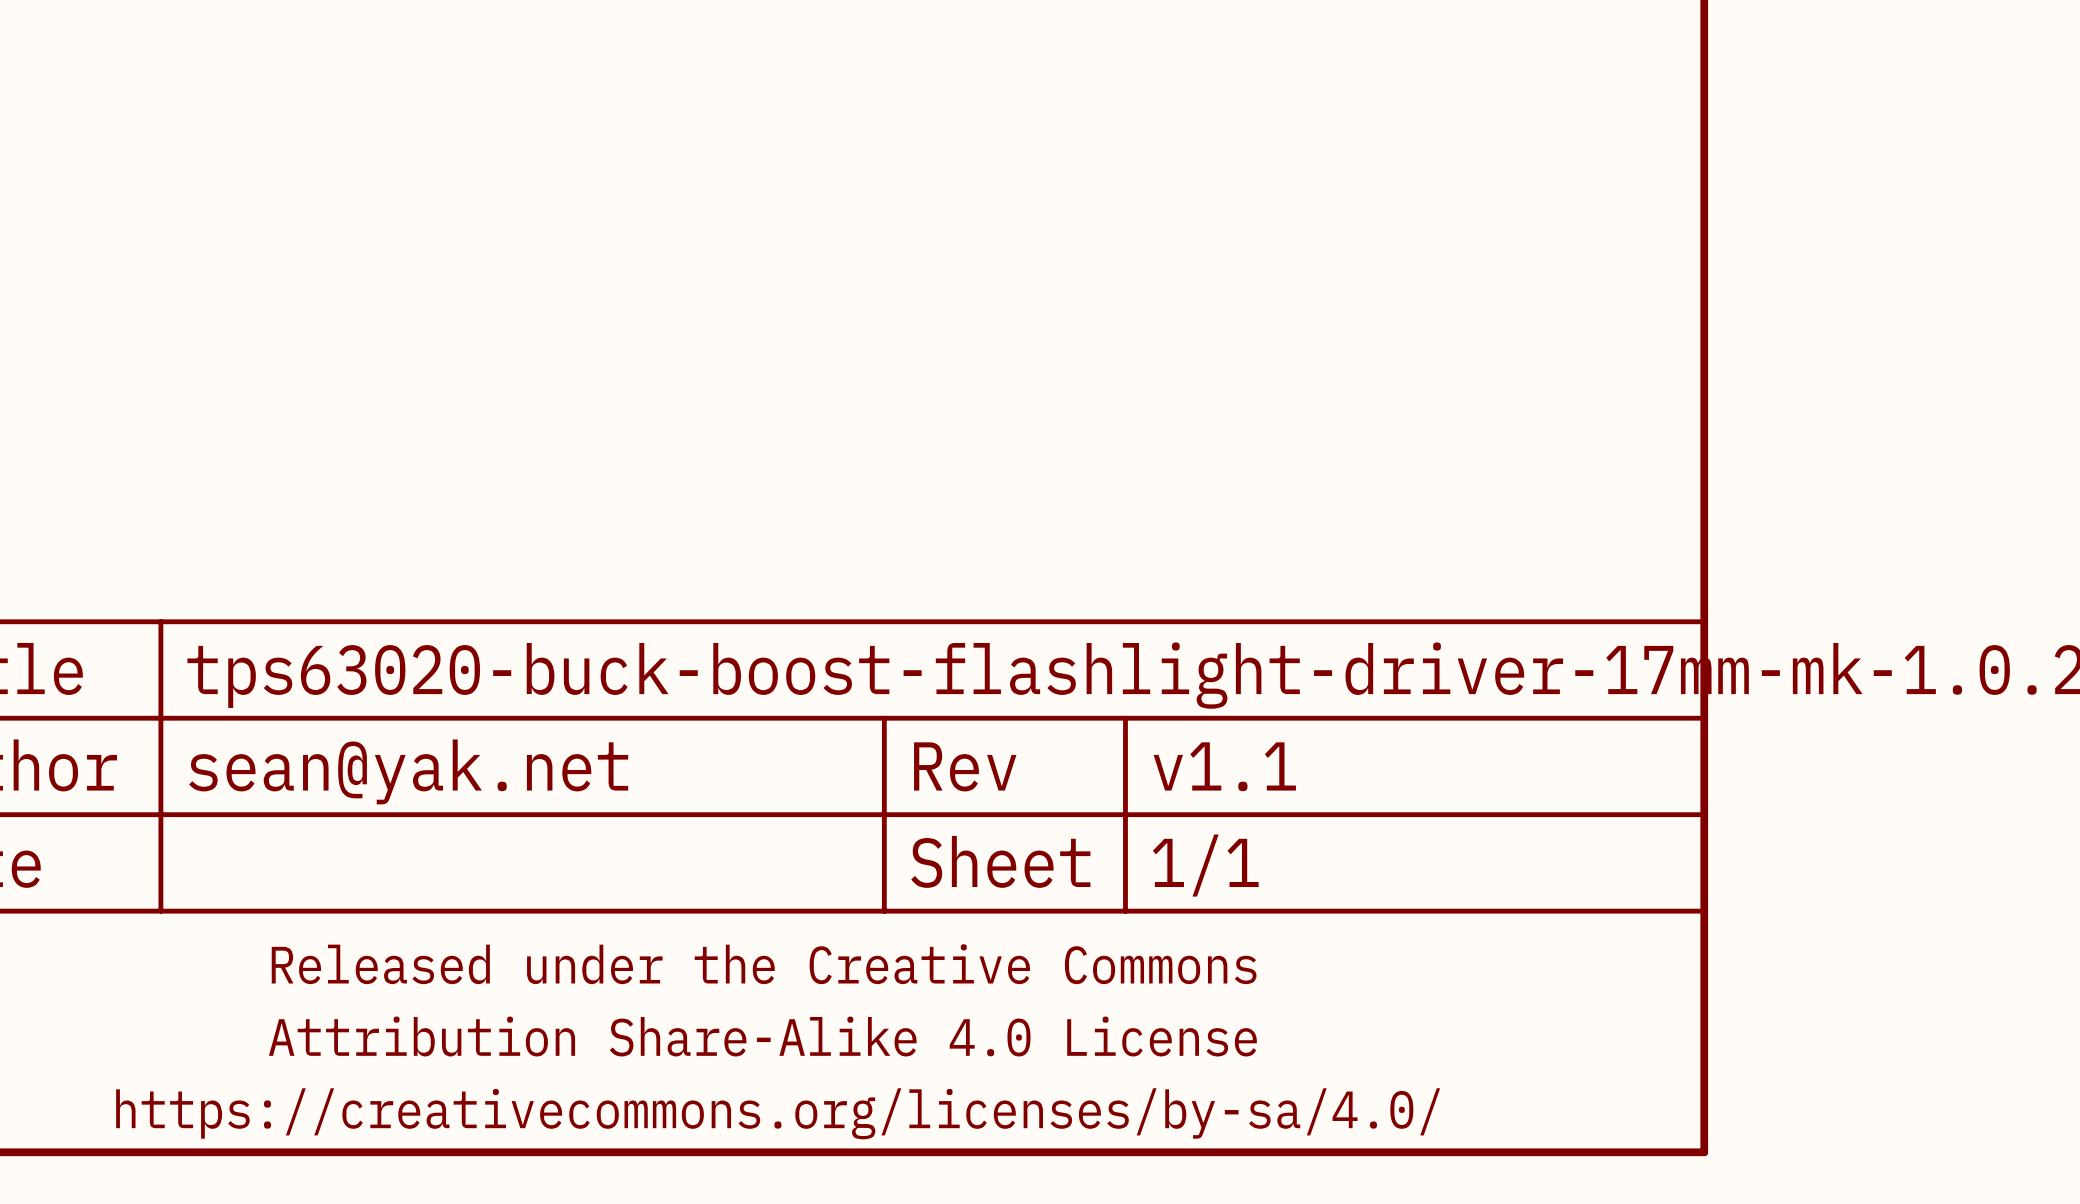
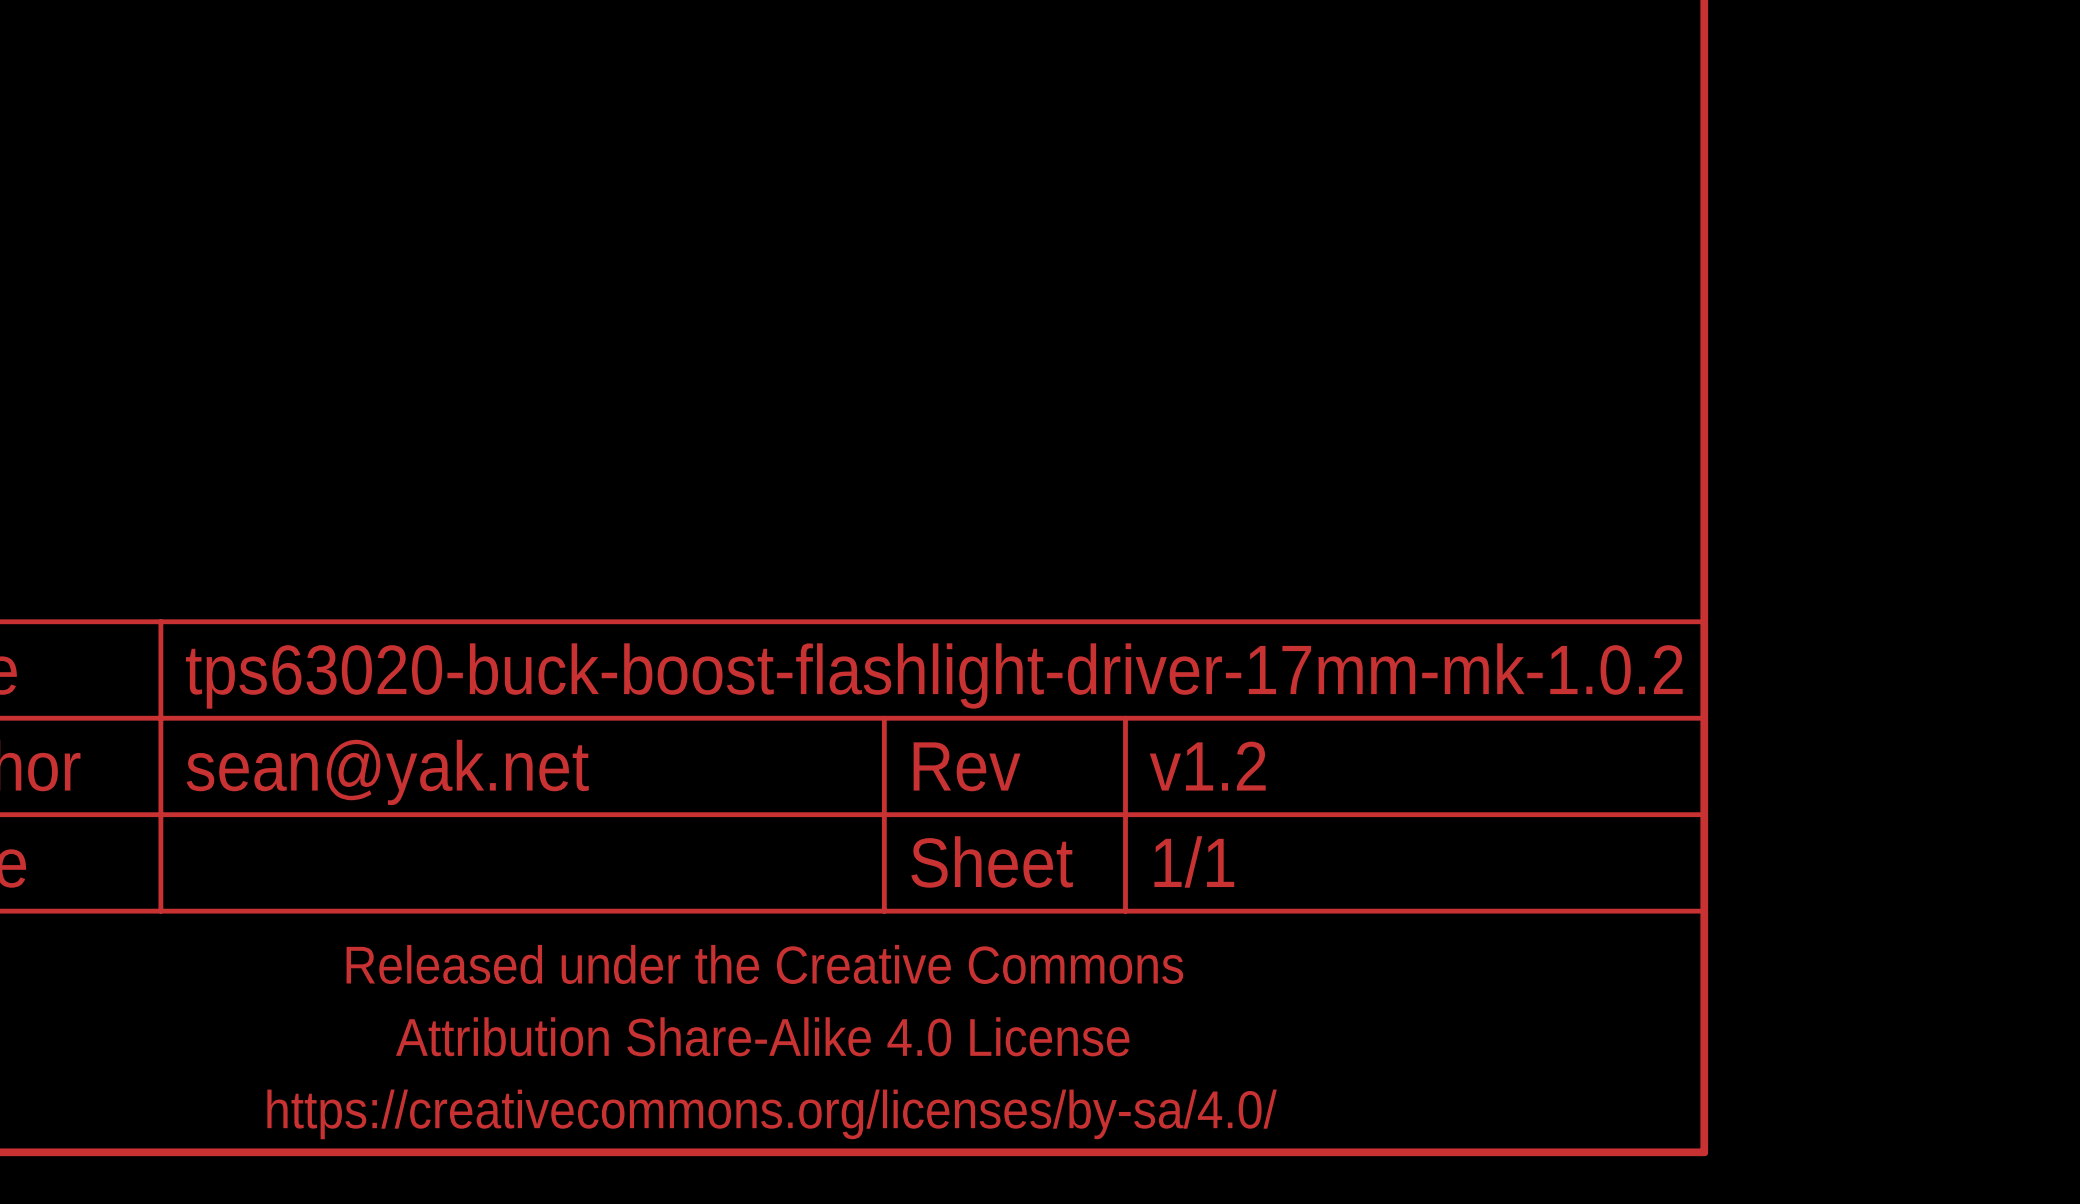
part text: v1.1 (1224, 766) -> v1.2 (1207, 766)

